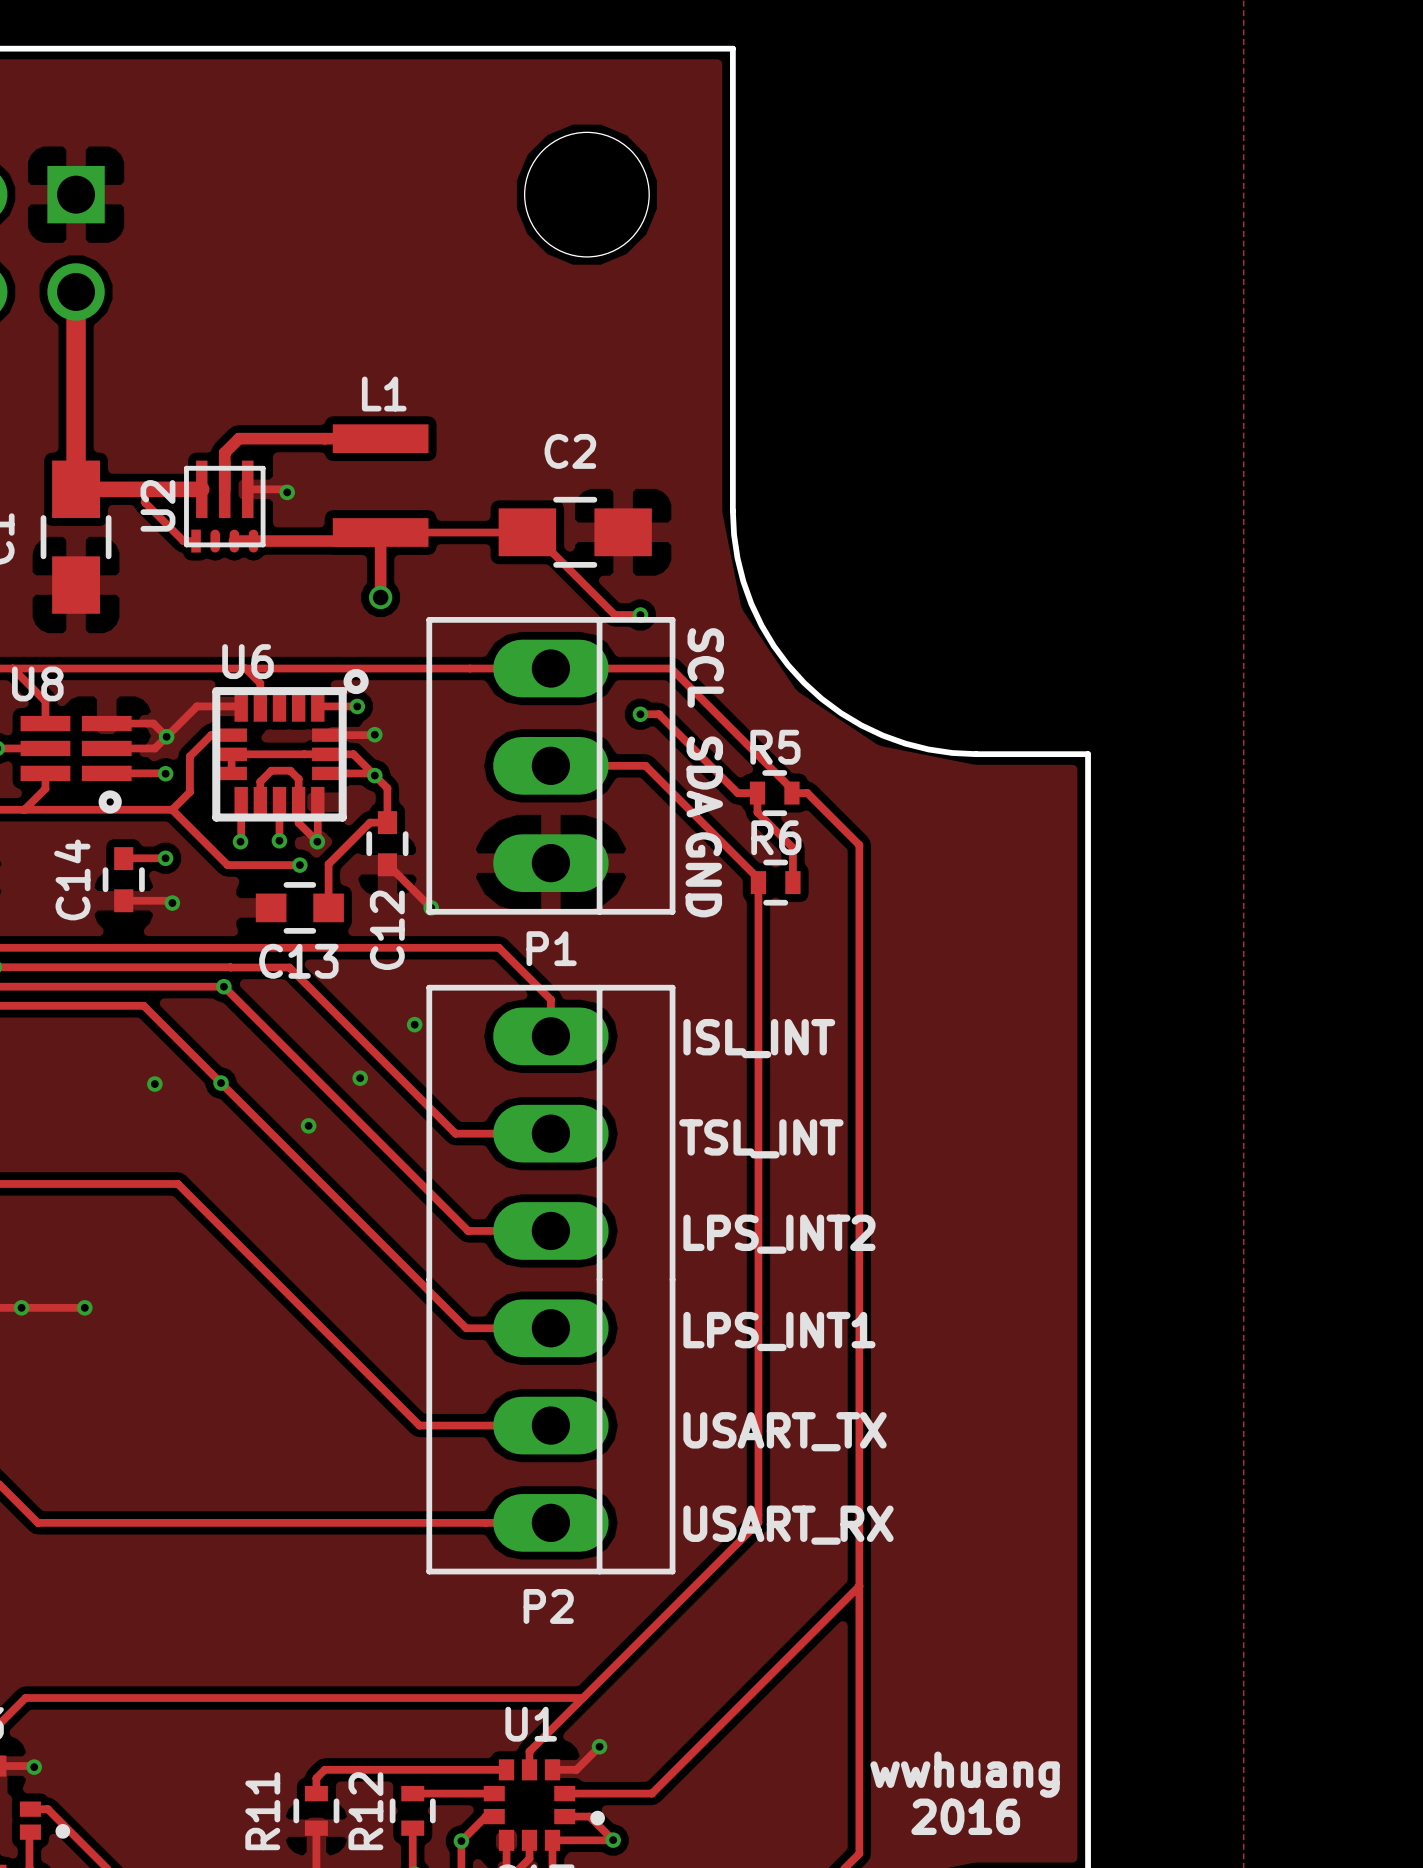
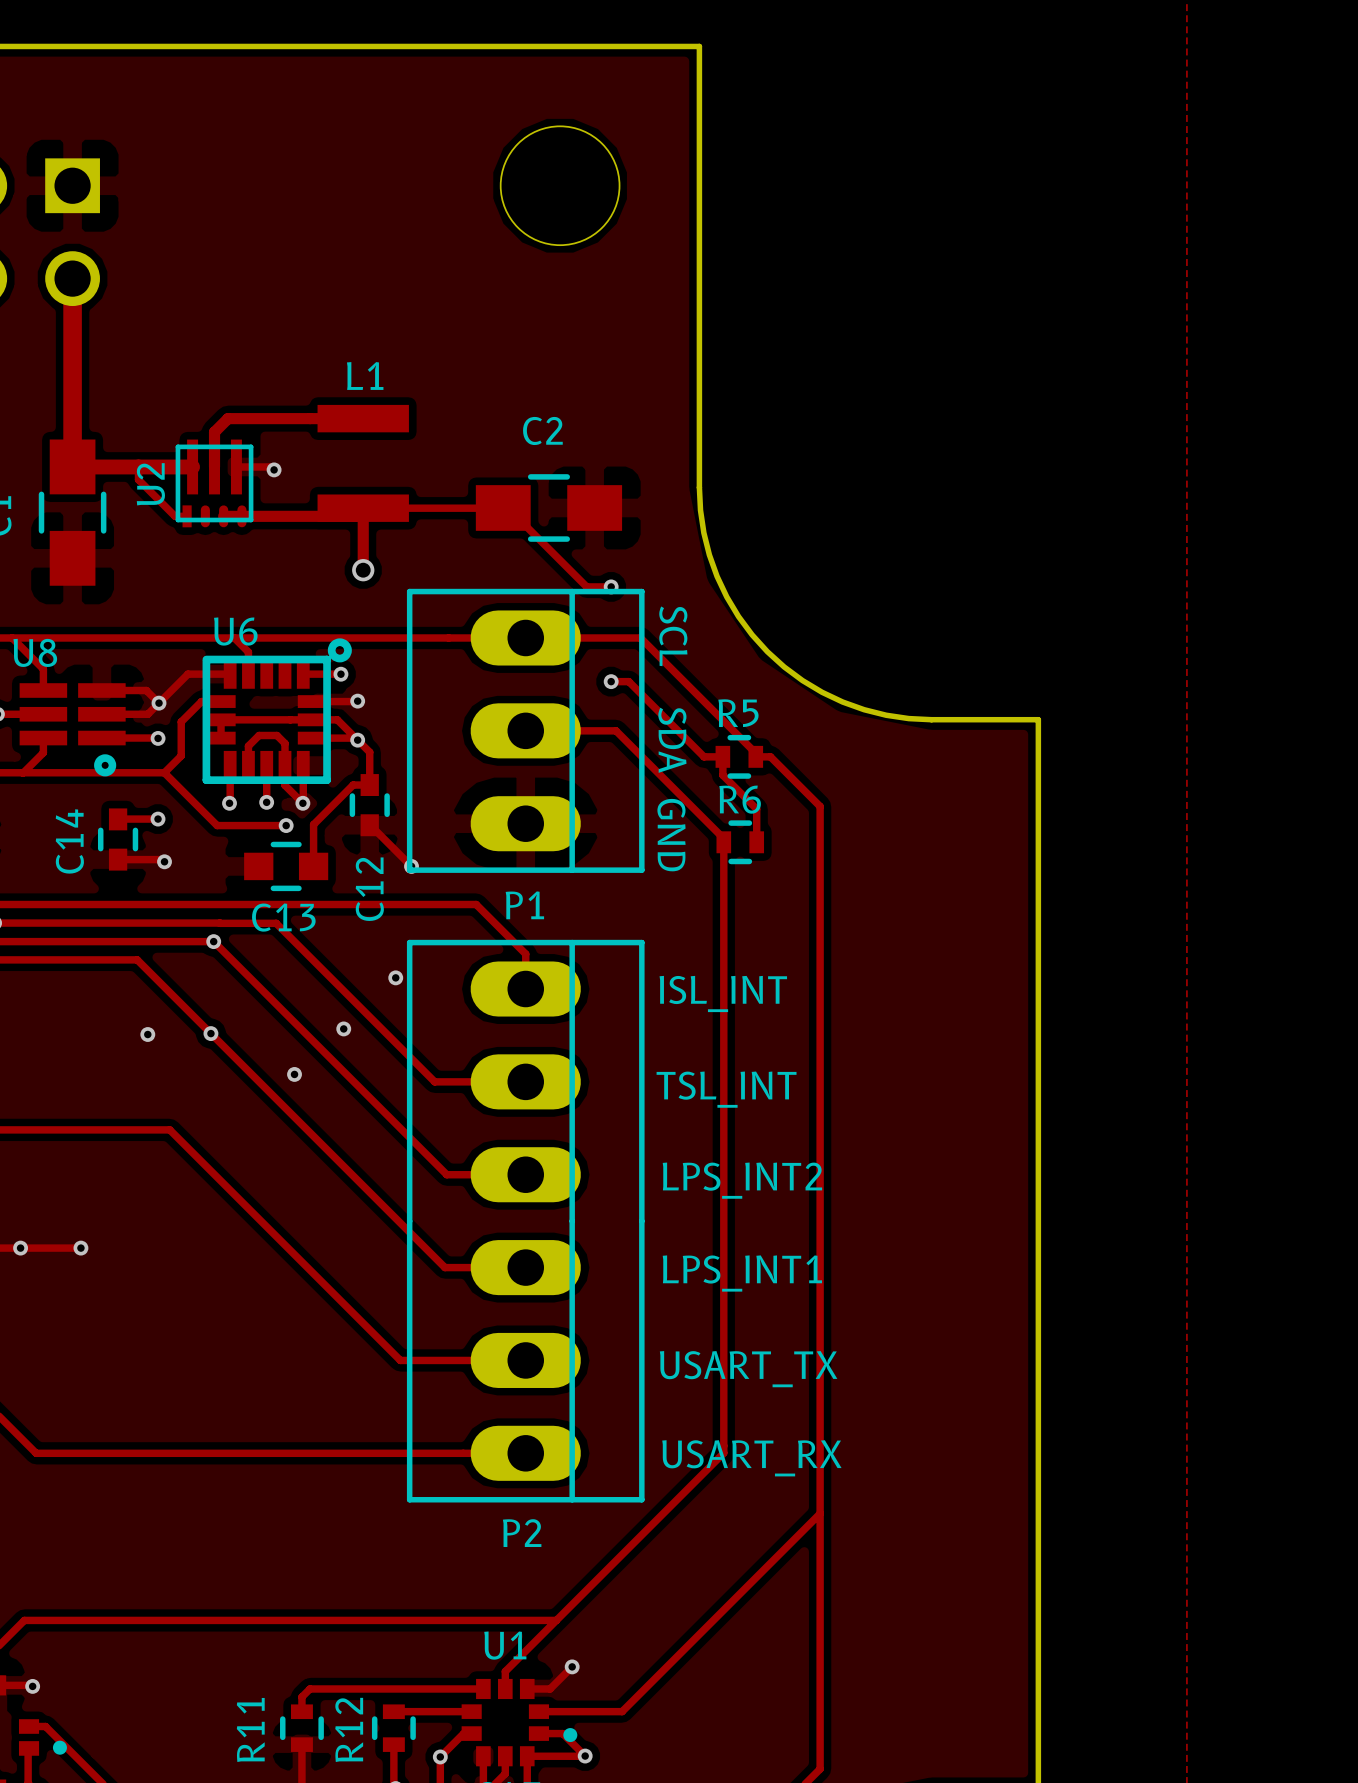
text: wwhuang (965, 1774) -> none
text: 2016 (965, 1816) -> none

